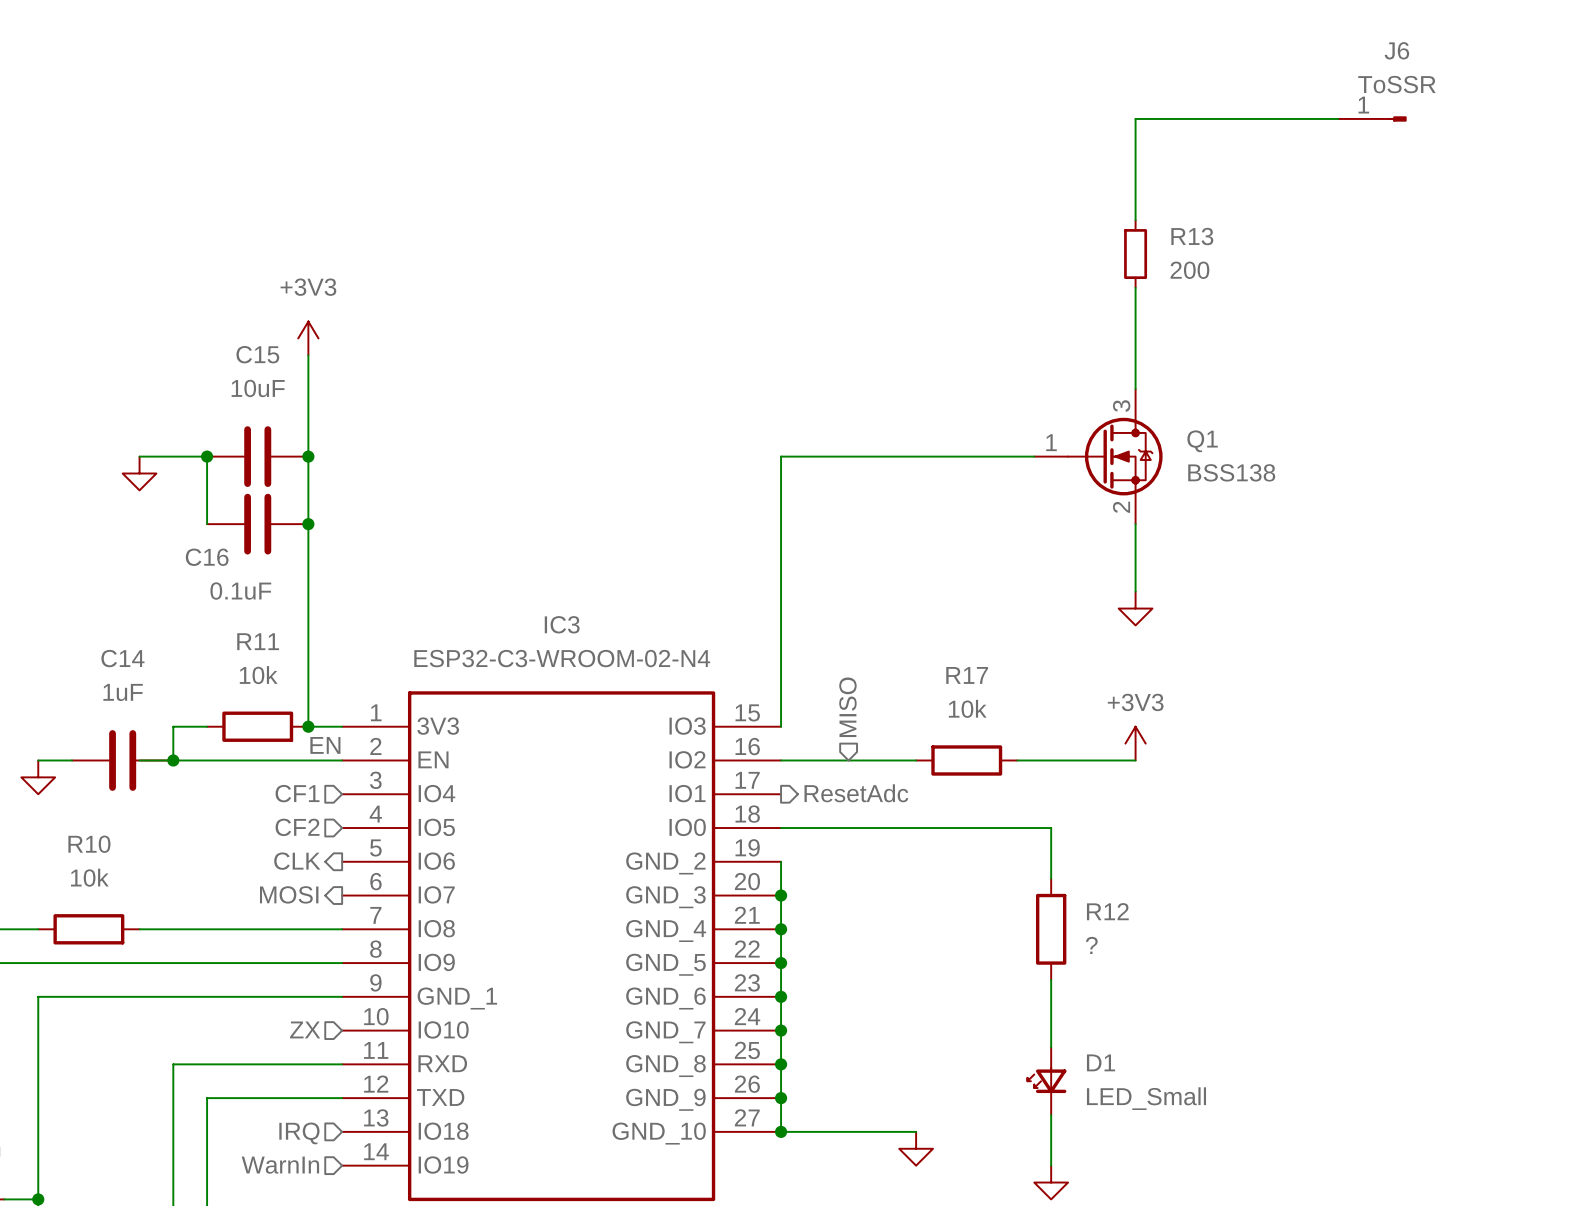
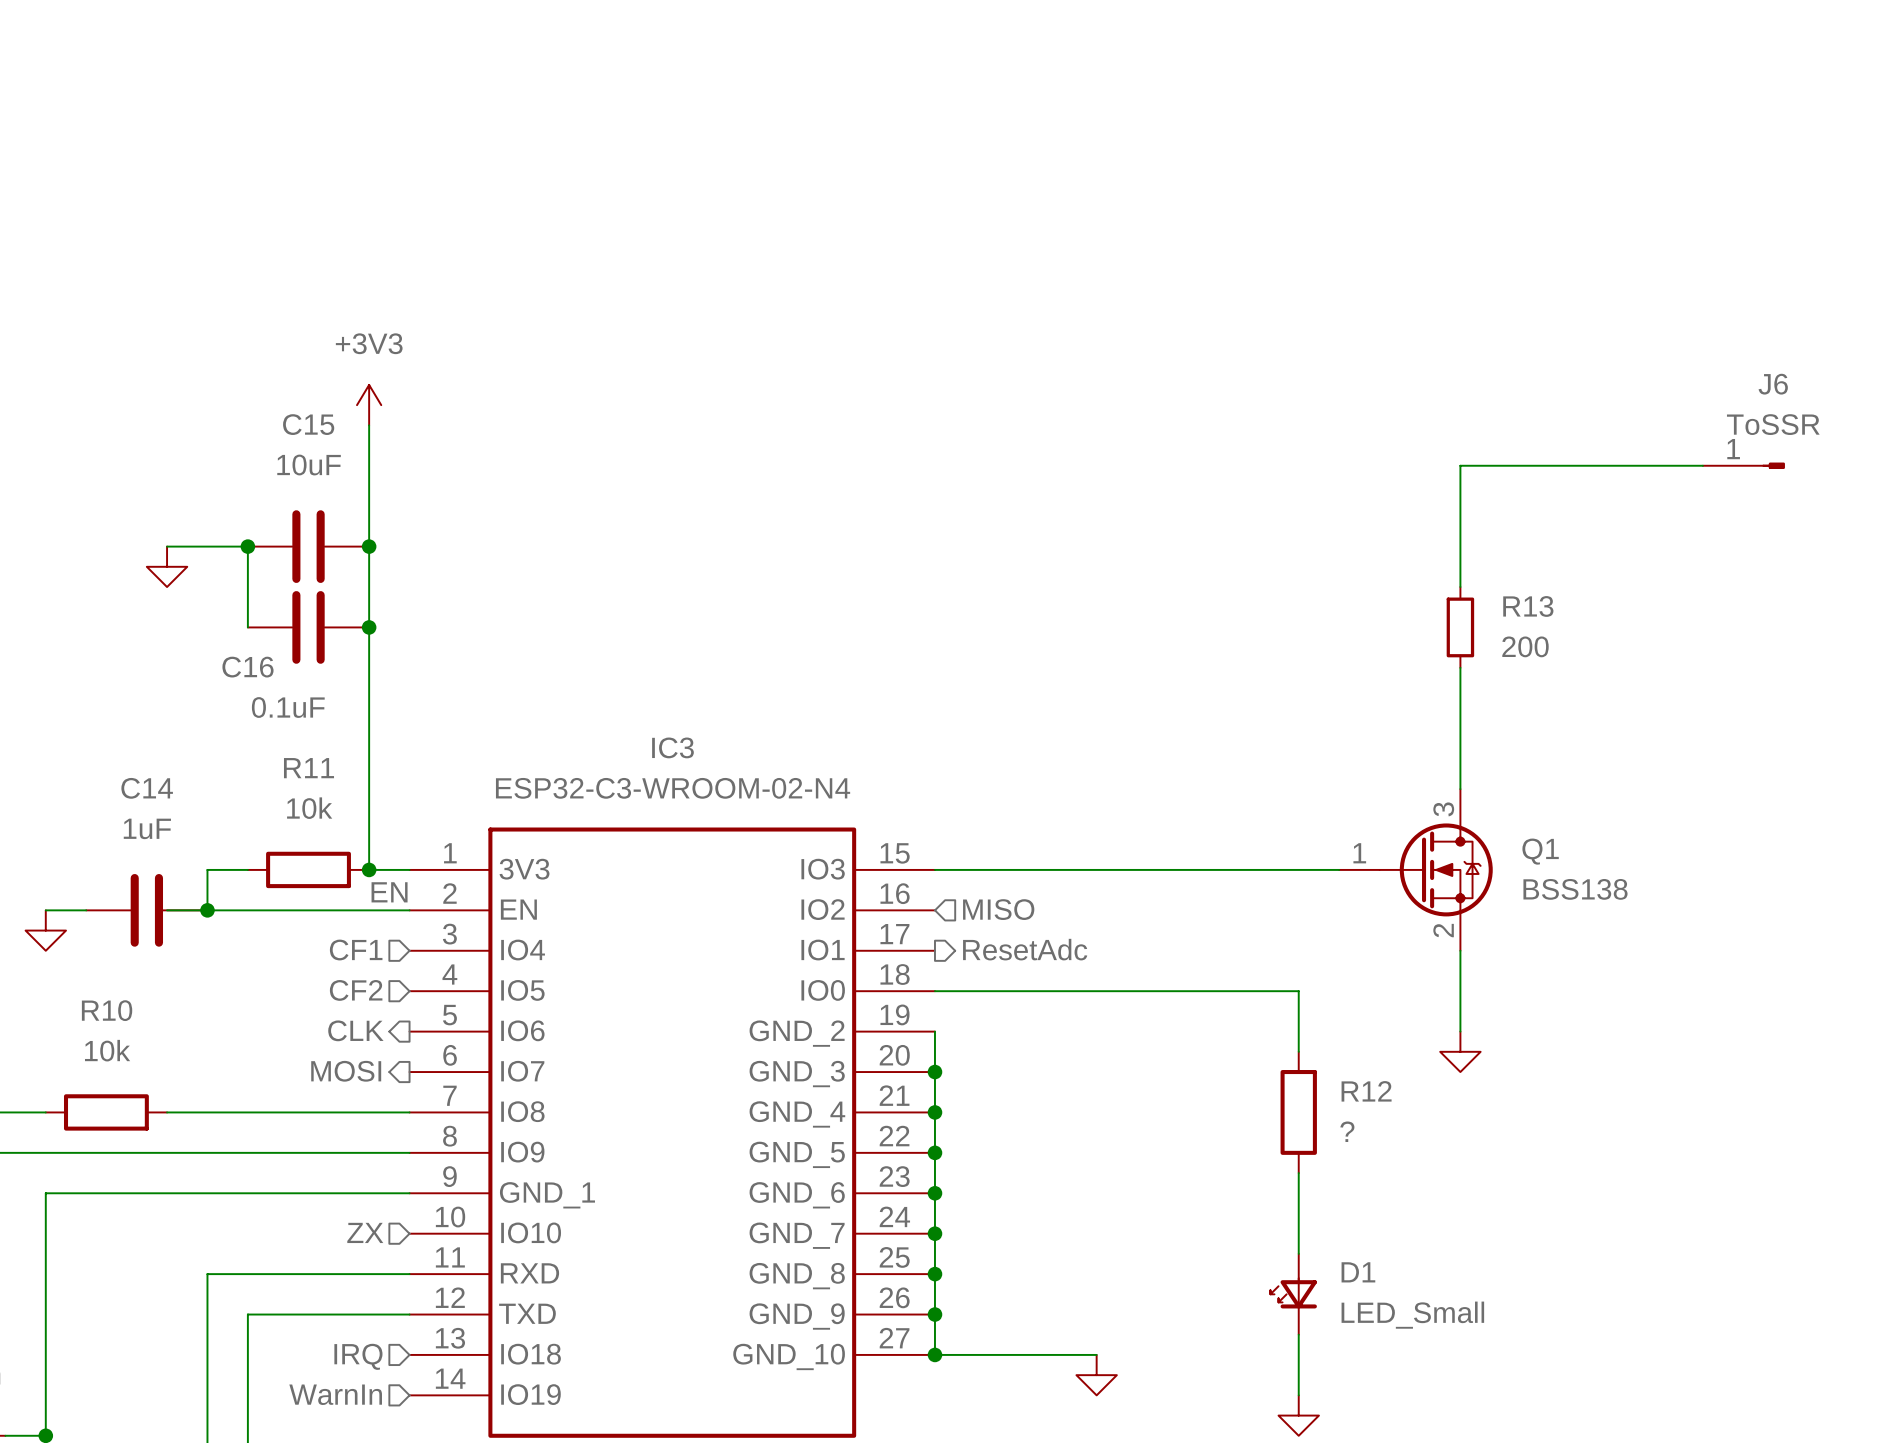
wire: (1338, 118) (1135, 118) (1135, 220) -> (1702, 465) (1460, 465) (1460, 587)
J6 position: (1372, 118) -> (1743, 465)
R13 position: (1135, 254) -> (1460, 627)
wire: (1135, 287) (1135, 389) -> (1460, 667) (1460, 789)
wire: (1034, 456) (781, 456) (781, 726) -> (1339, 869) (934, 869)
Q1 position: (1098, 456) -> (1415, 869)
wire: (1135, 524) (1135, 591) -> (1460, 950) (1460, 1031)
power symbol: (1135, 608) -> none
hierarchical label rotation: 0° (847, 707) -> 90° clockwise (998, 909)
power symbol: +3V3 (1135, 743) -> none
wire: (781, 760) (916, 760) -> none
R17: 10k (966, 760) -> none
wire: (1017, 760) (1135, 760) -> none
wire: (1051, 828) (1051, 878) -> (1258, 991) (1298, 991) (1298, 1051)
power symbol: none -> (1460, 1051)
R12 position: (1051, 929) -> (1298, 1112)
wire: (1051, 979) (1051, 1047) -> (1298, 1173) (1298, 1253)
D1 position: (1046, 1081) -> (1293, 1294)
wire: (1051, 1115) (1051, 1165) -> (1298, 1334) (1298, 1395)
power symbol position: (1051, 1182) -> (1298, 1415)

